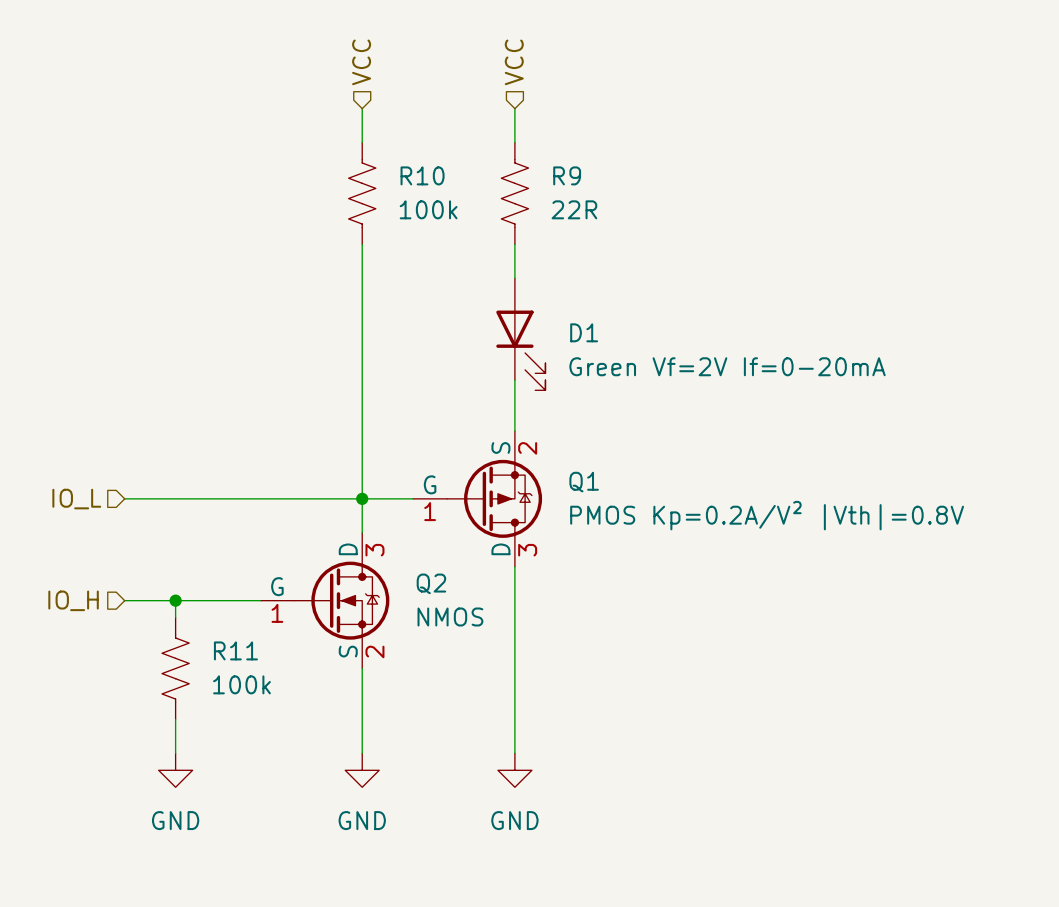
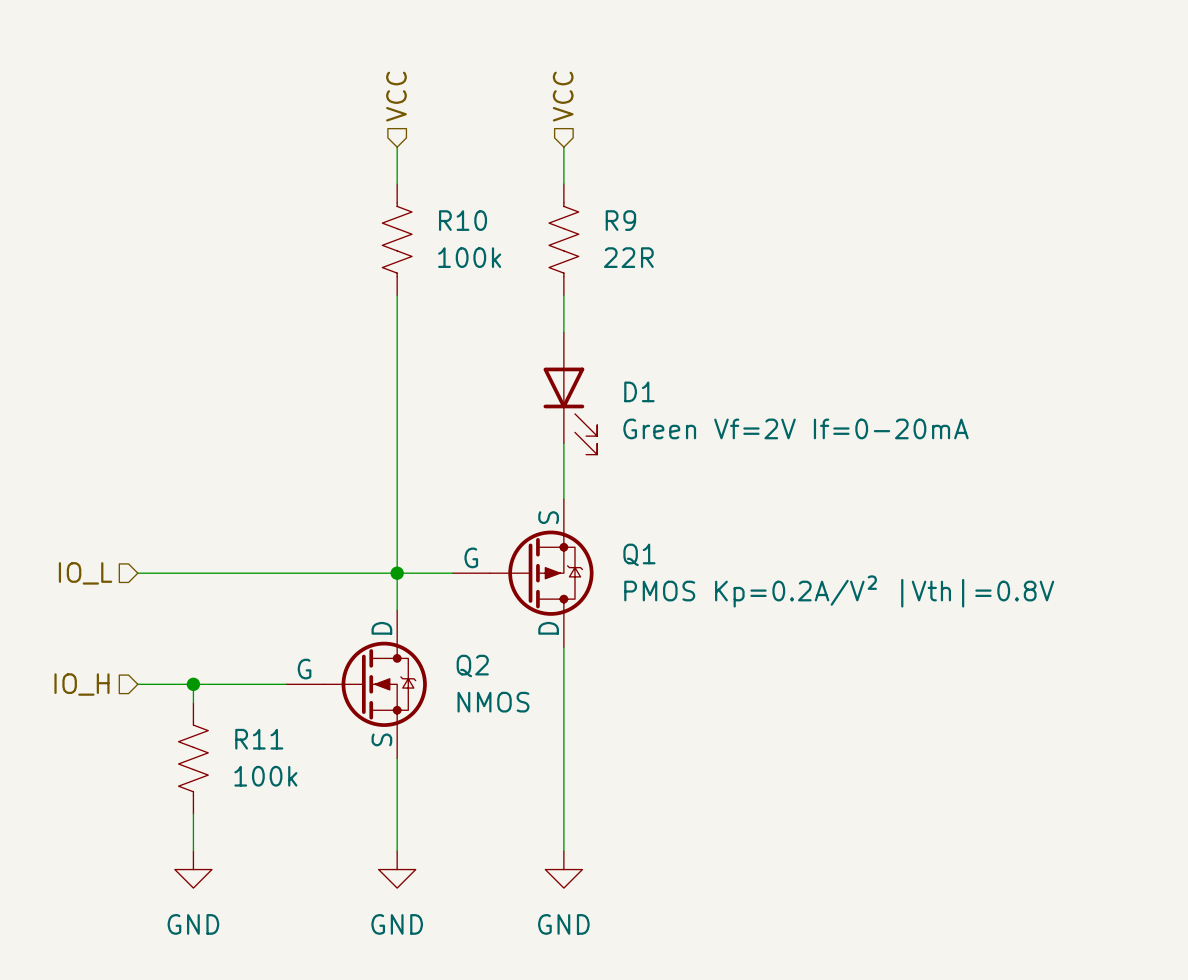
Q1 pin number: 2 (527, 448) -> none
Q1 pin number: 1 (430, 511) -> none
Q2 pin number: 3 (374, 550) -> none
Q1 pin number: 3 (527, 550) -> none
Q2 pin number: 1 (277, 613) -> none
Q2 pin number: 2 (374, 651) -> none

